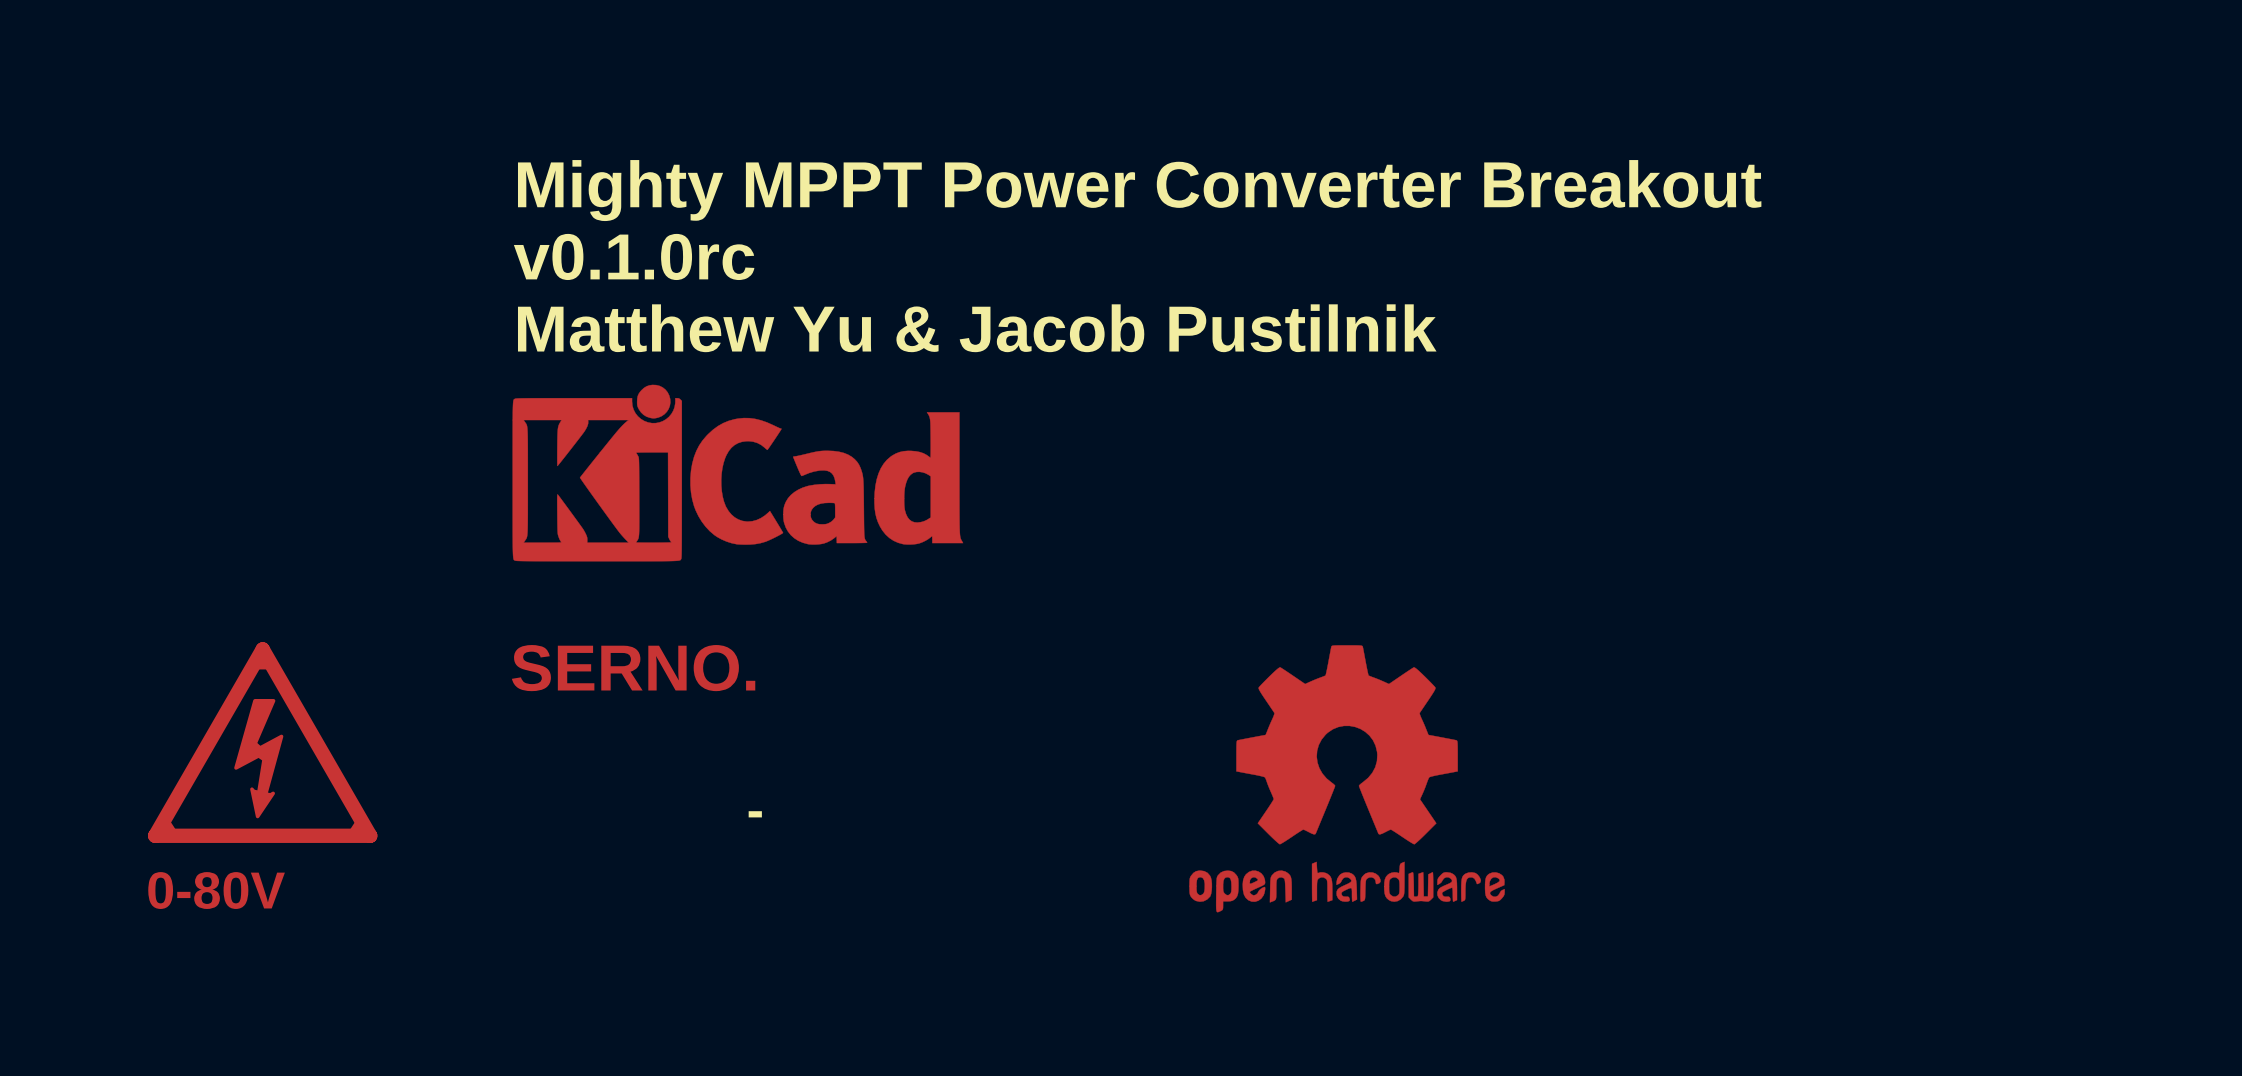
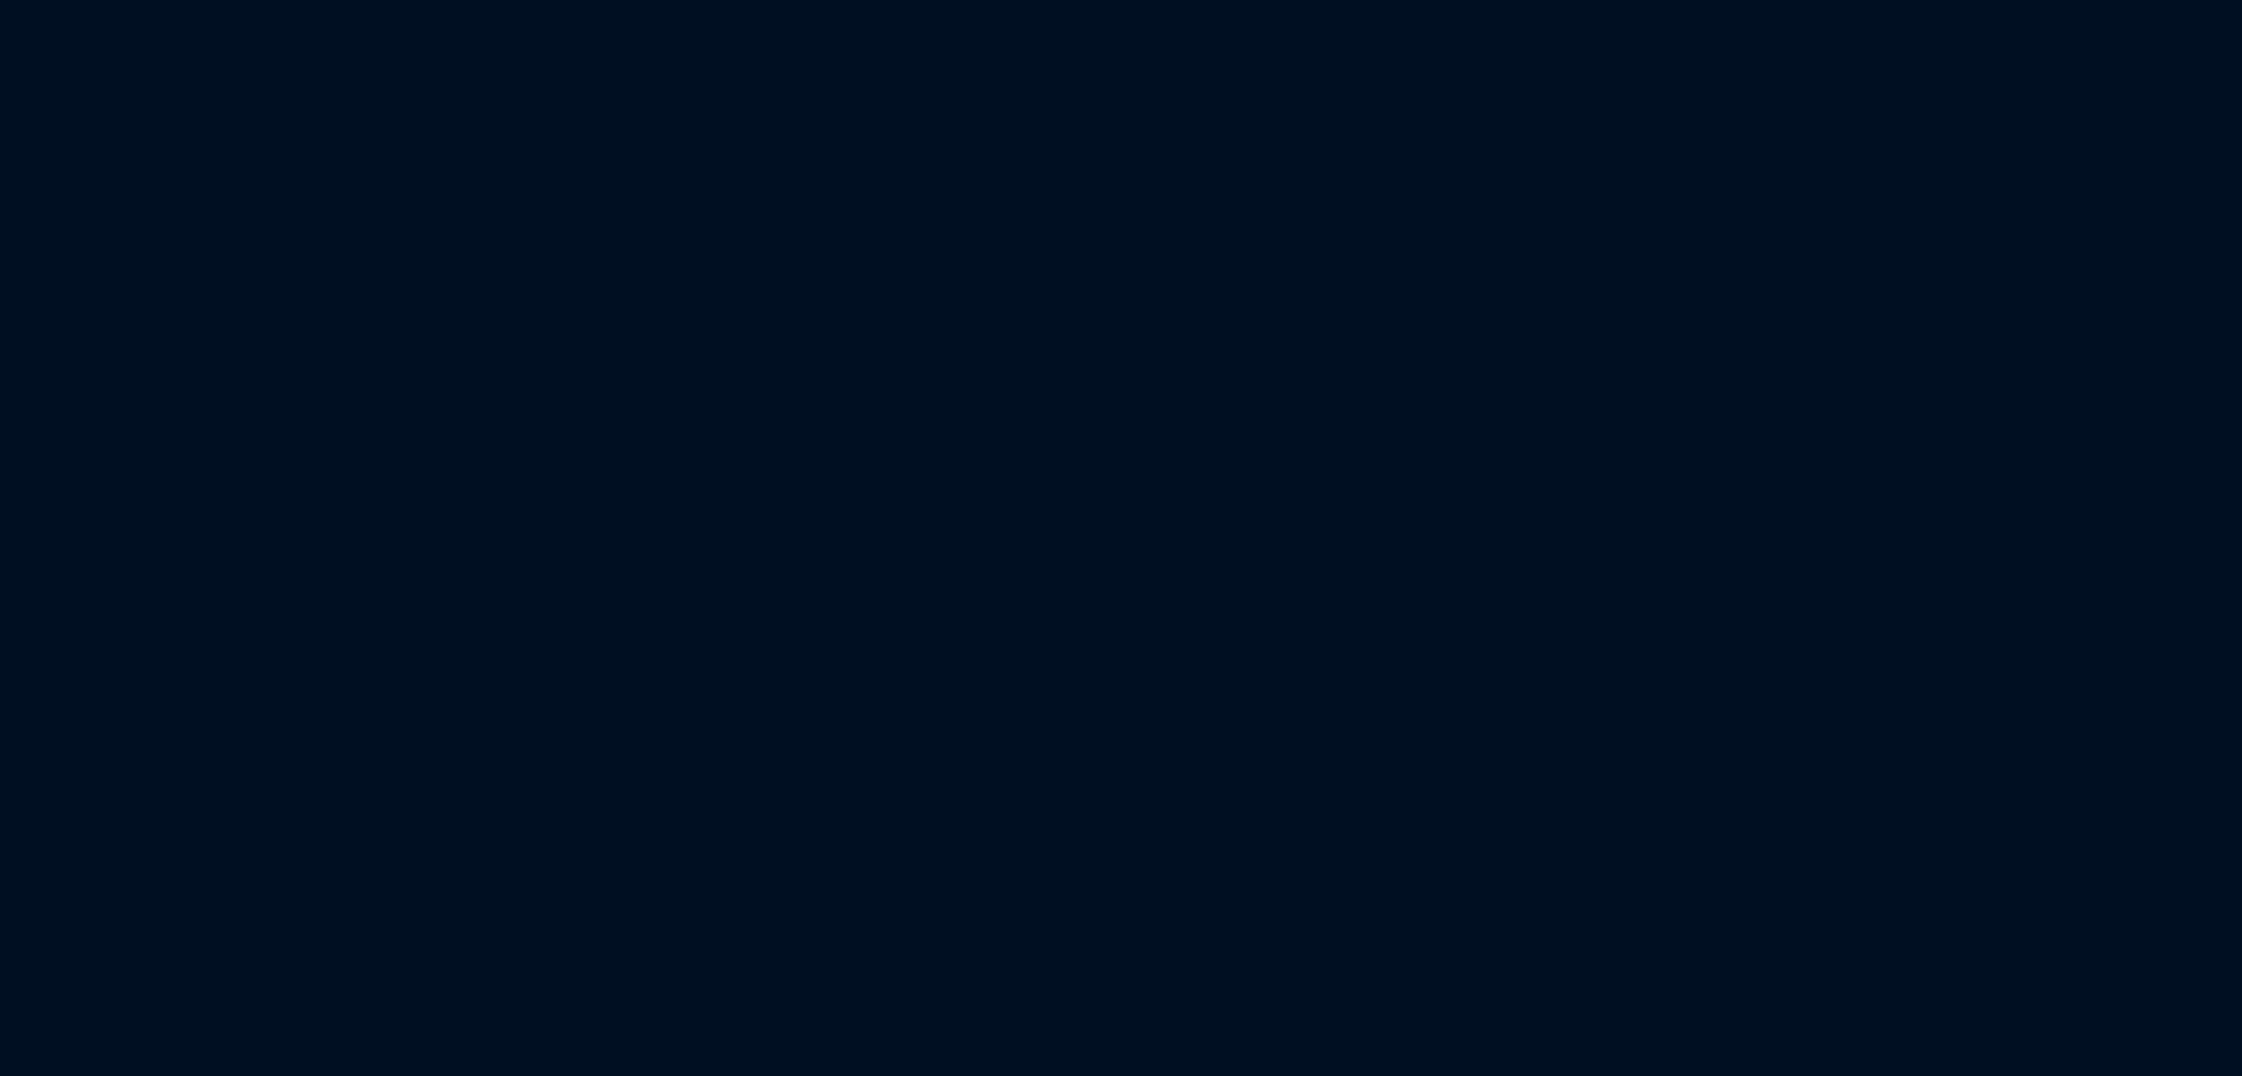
text: Mighty MPPT Power Converter Breakout (1139, 190) -> none
text: v0.1.0rc (634, 256) -> none
text: Matthew Yu & Jacob Pustilnik (977, 328) -> none
drawing: [512, 384, 964, 562] -> none
drawing: [147, 642, 378, 843] -> none
drawing: [1189, 645, 1505, 913] -> none
text: SERNO. (633, 668) -> none
text: - (755, 814) -> none
text: 0-80V (216, 890) -> none

